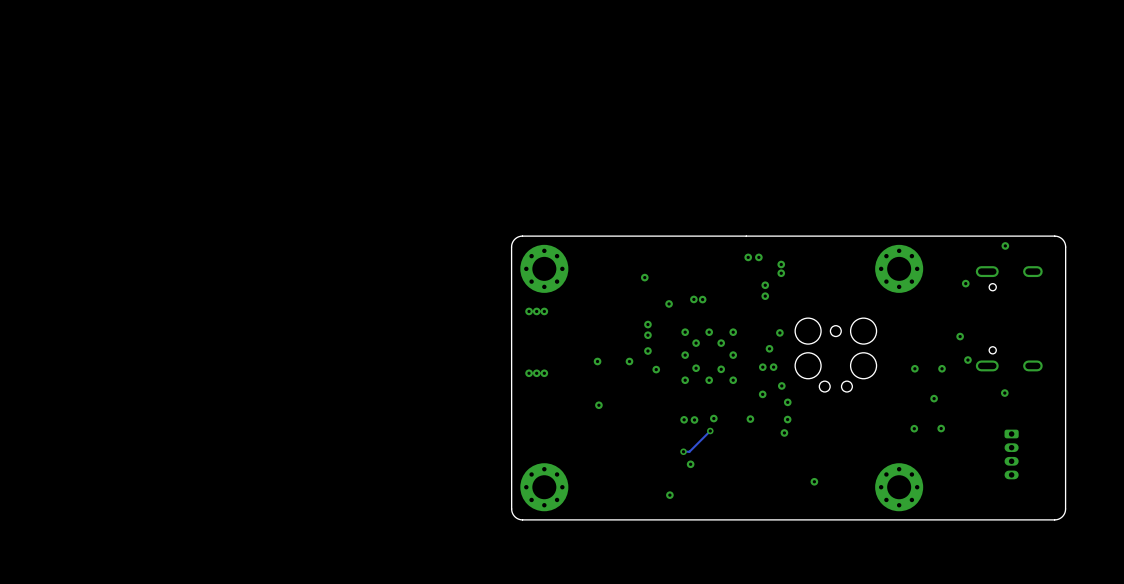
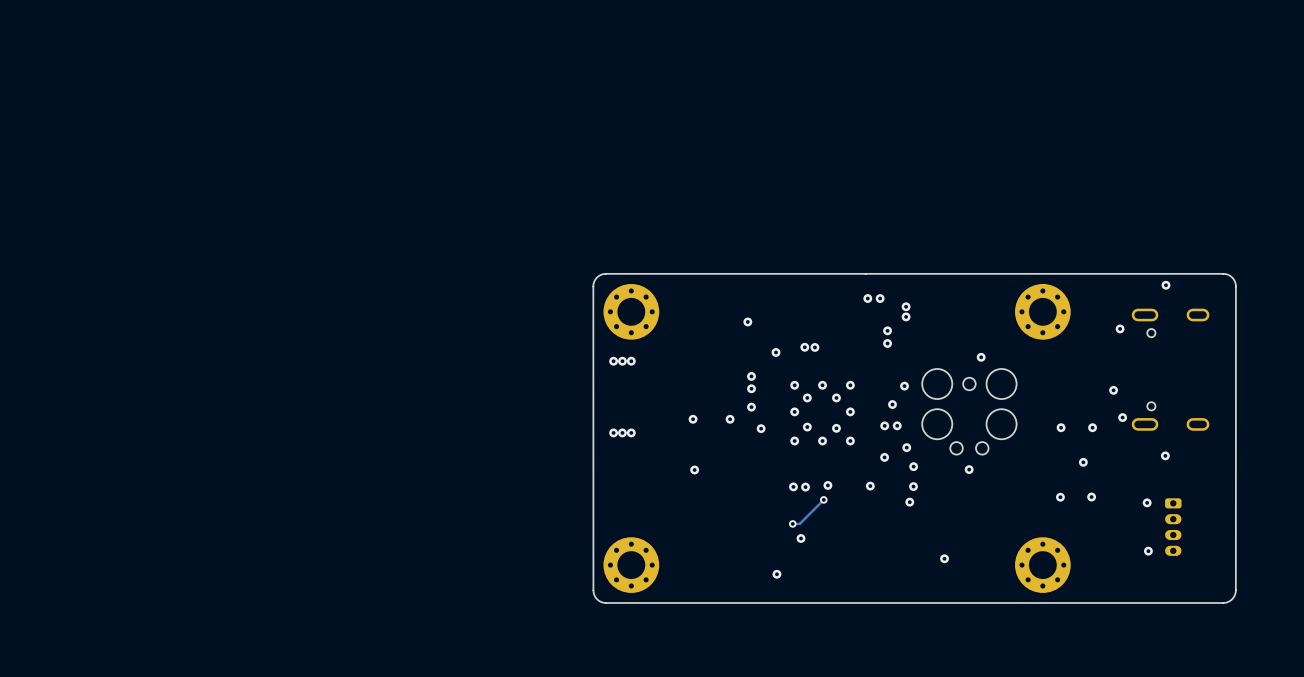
via: none -> (981, 357)
via: none -> (969, 469)
via: none -> (1147, 502)
via: none -> (1148, 551)

